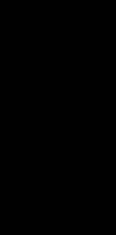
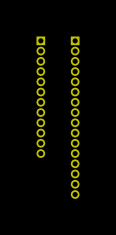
part: none -> (40, 97)
part: none -> (75, 117)

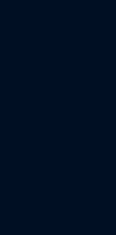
part: (40, 97) -> none
part: (75, 117) -> none

